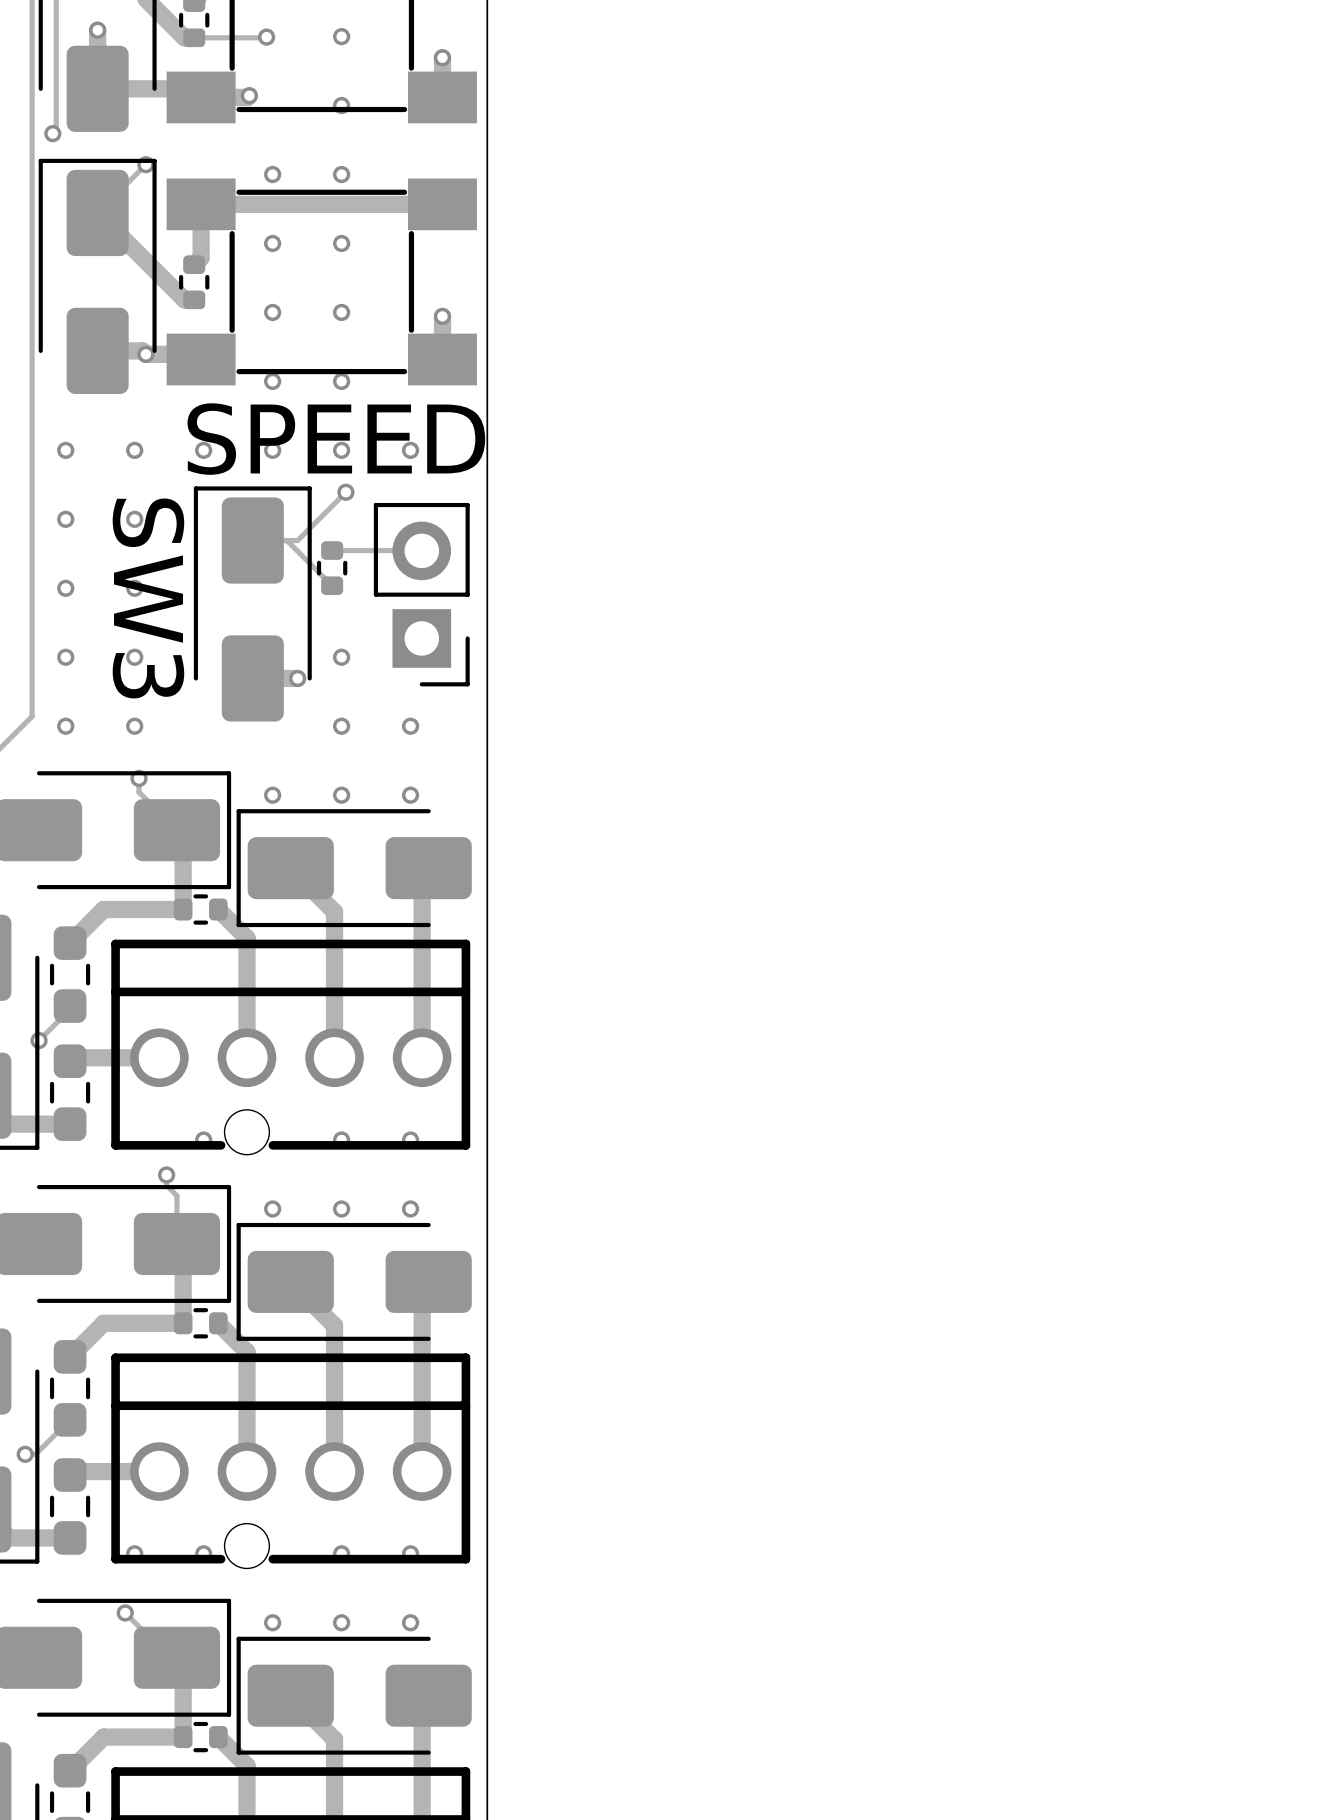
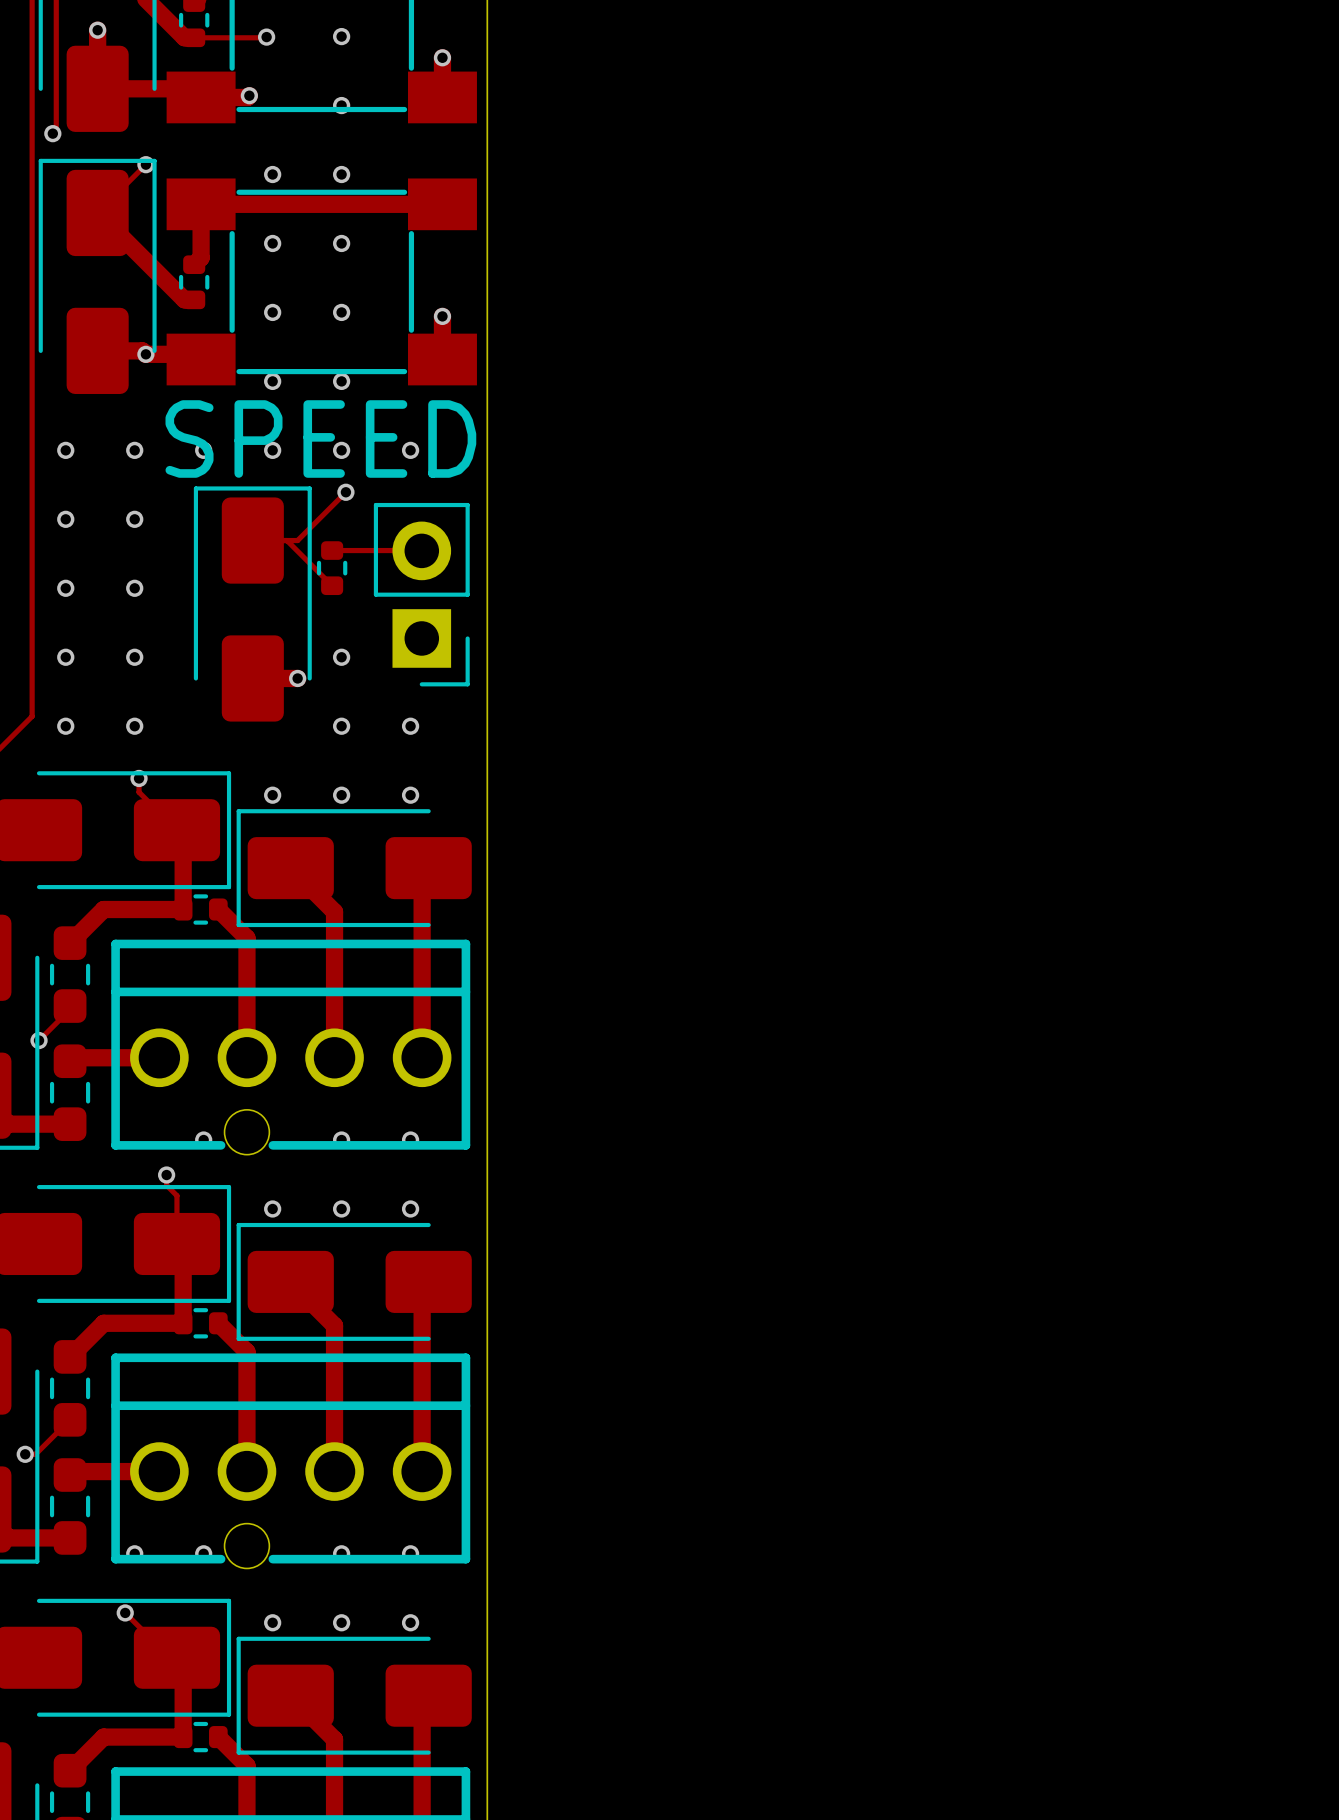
text: SW3 (148, 598) -> none

